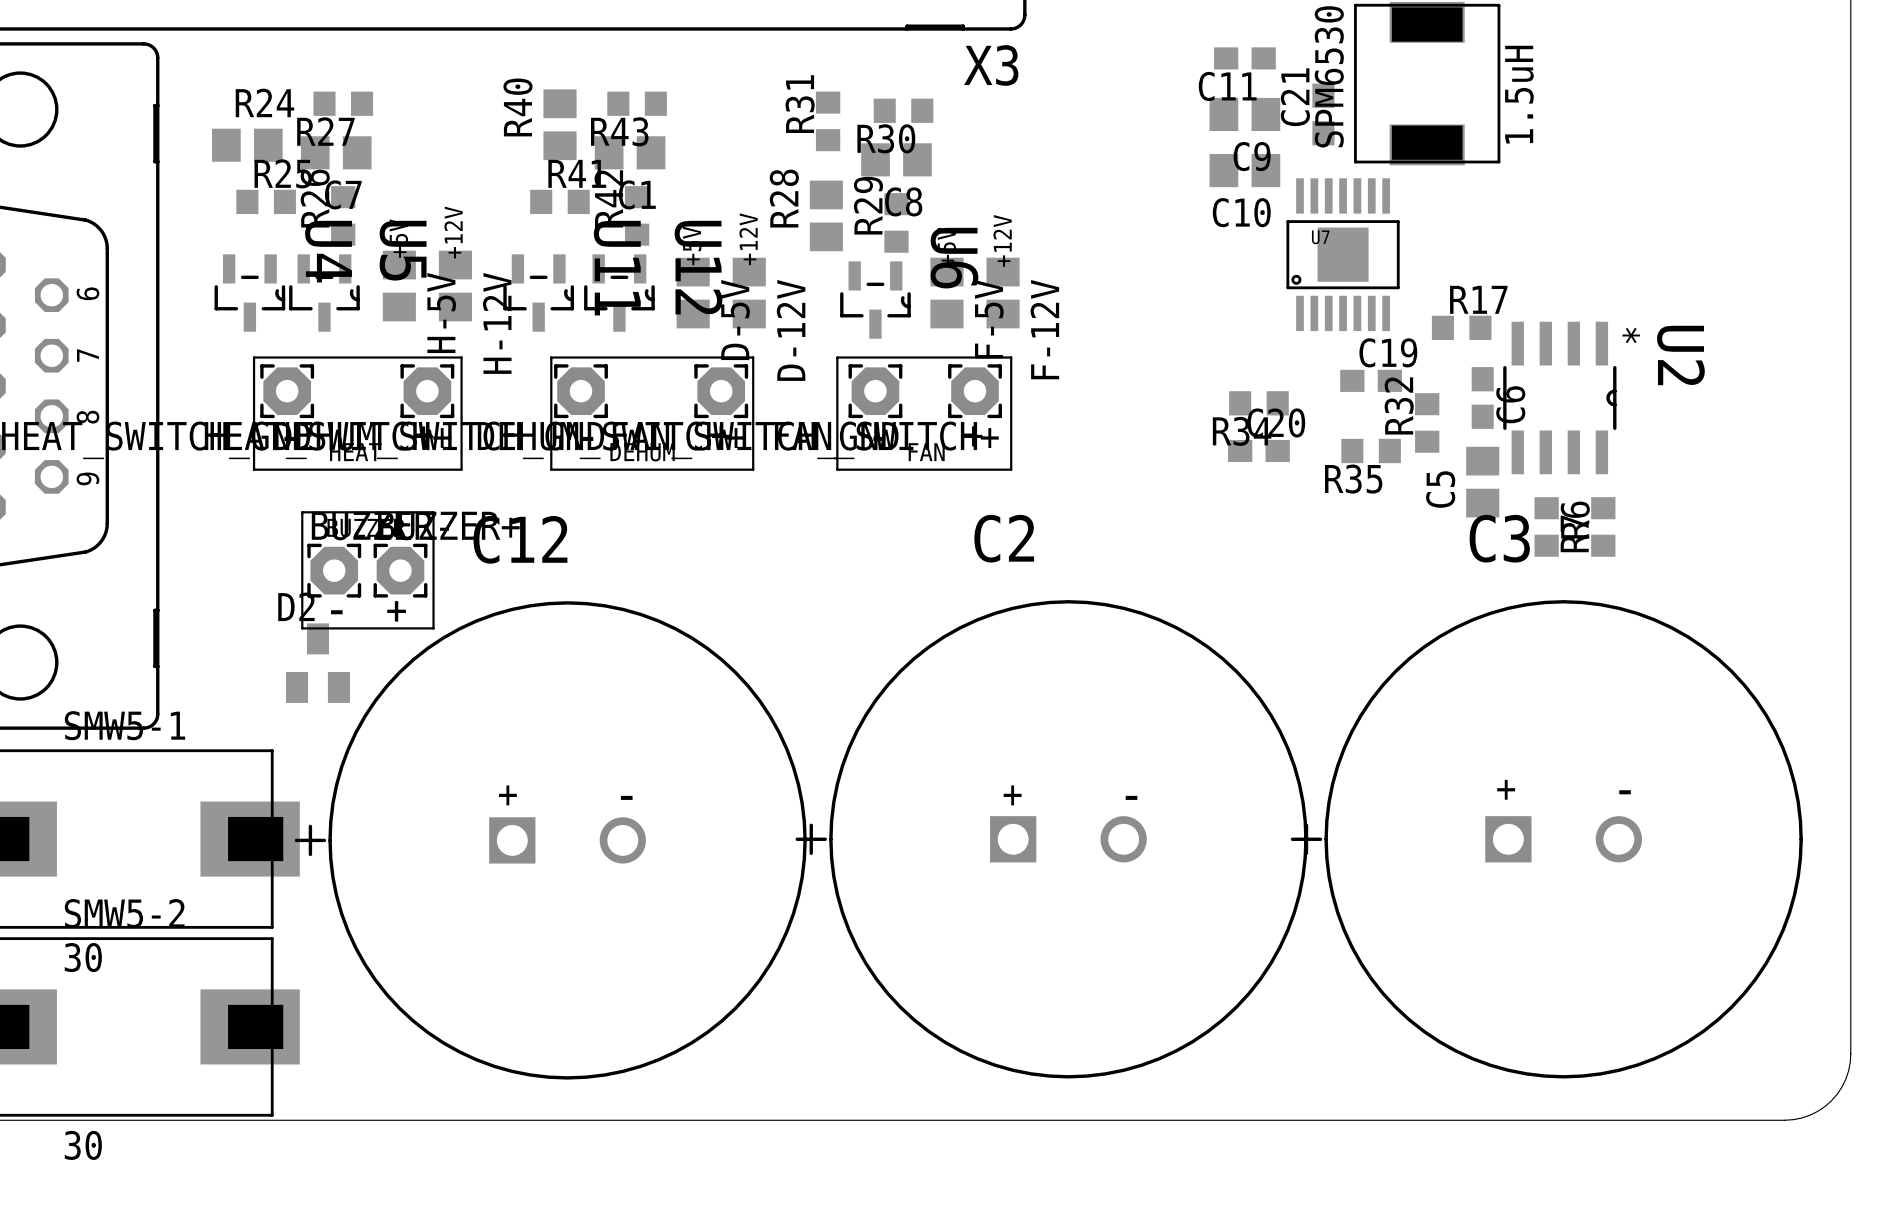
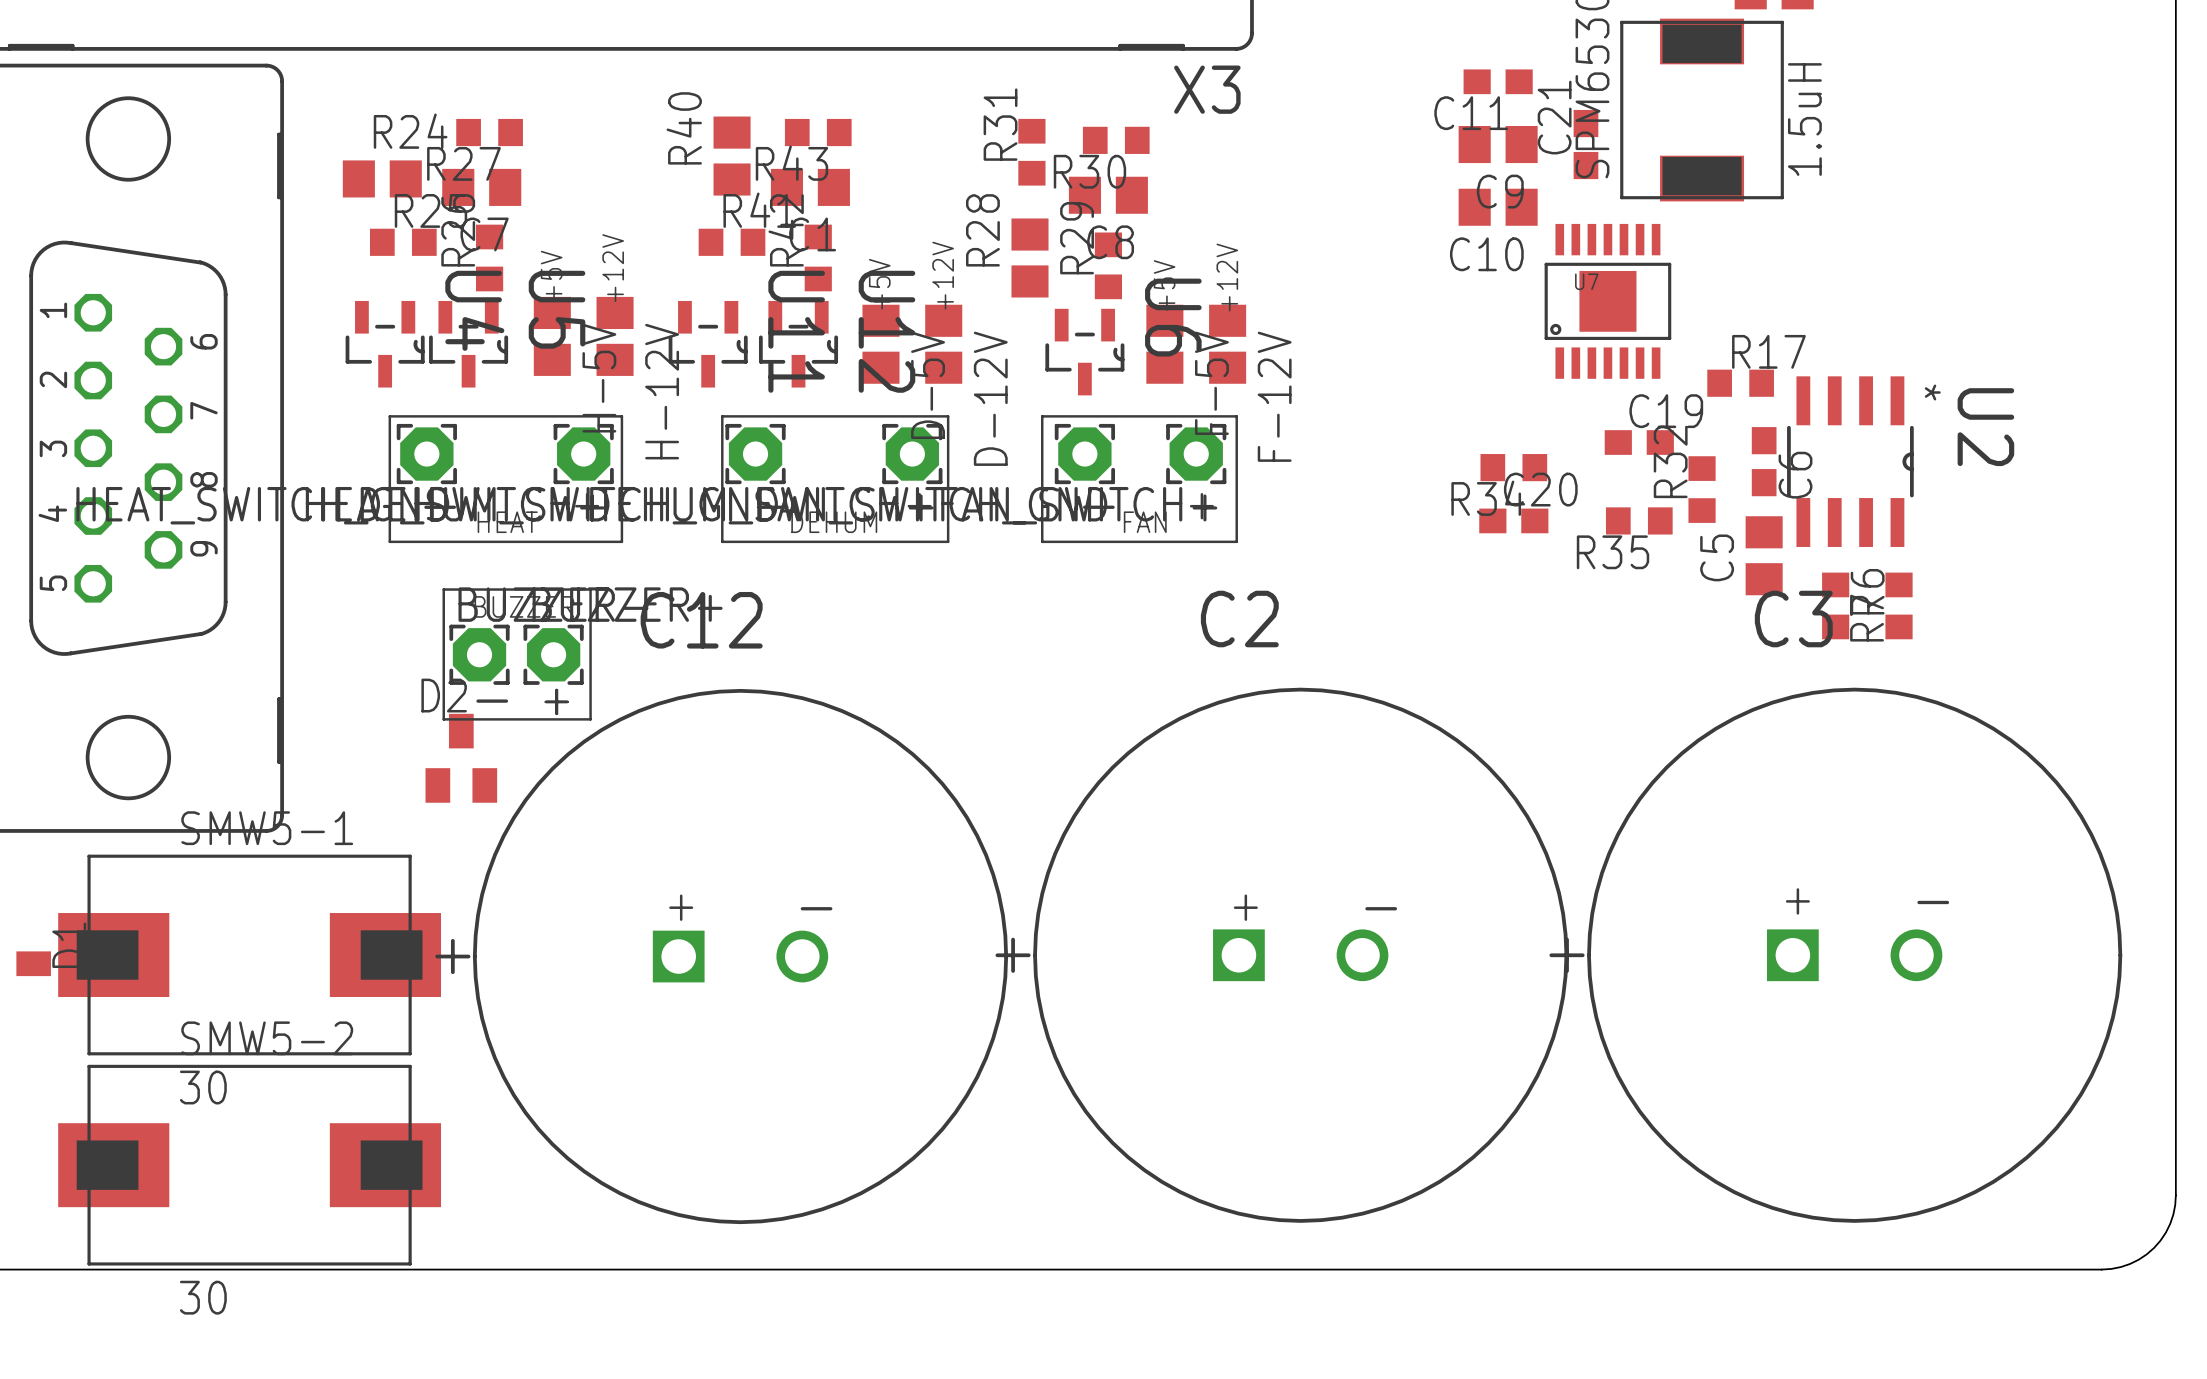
U7 footprint: [1286, 178, 1400, 332] -> [1544, 223, 1672, 379]

